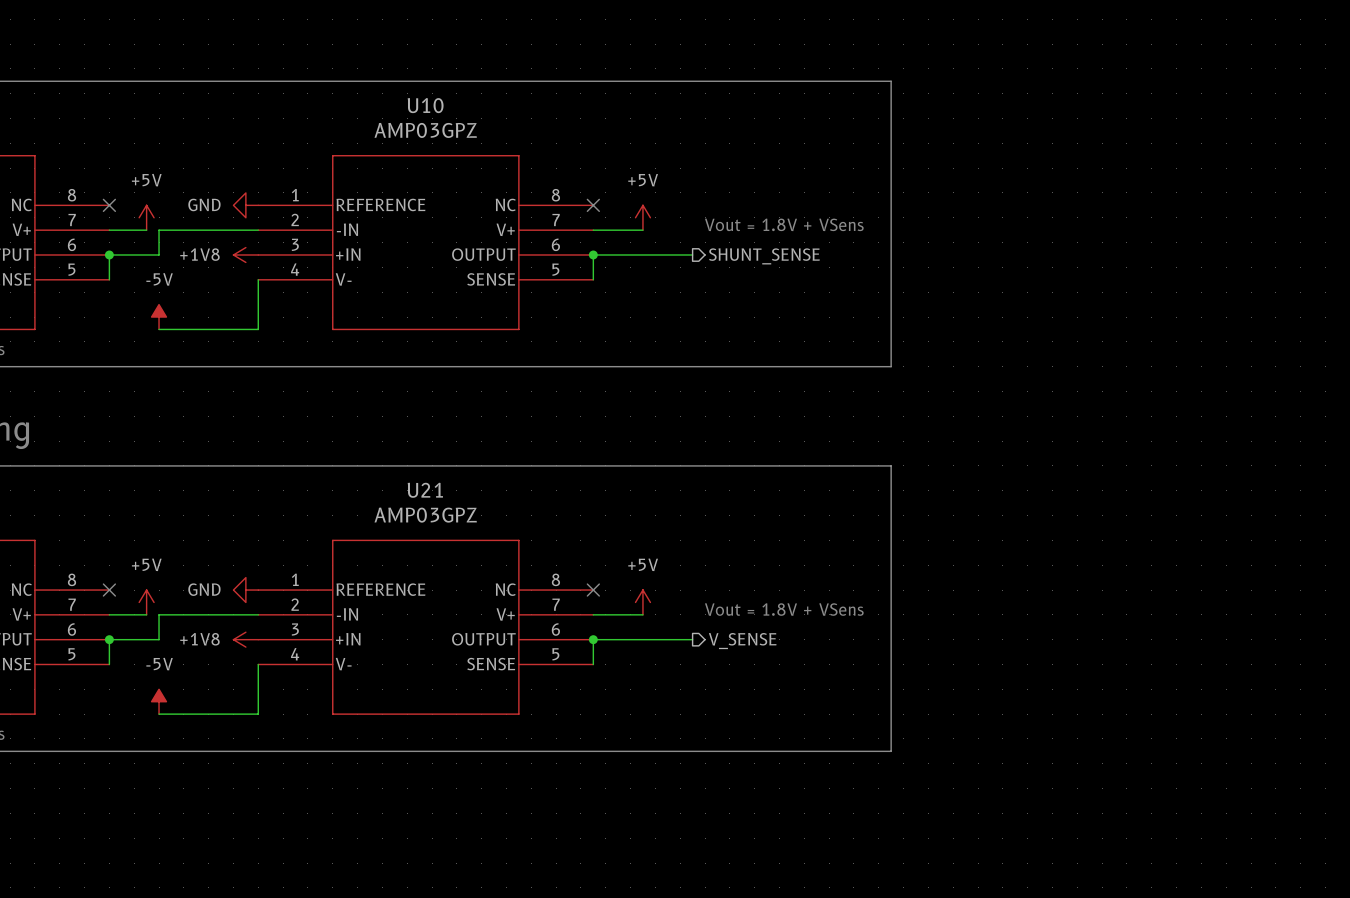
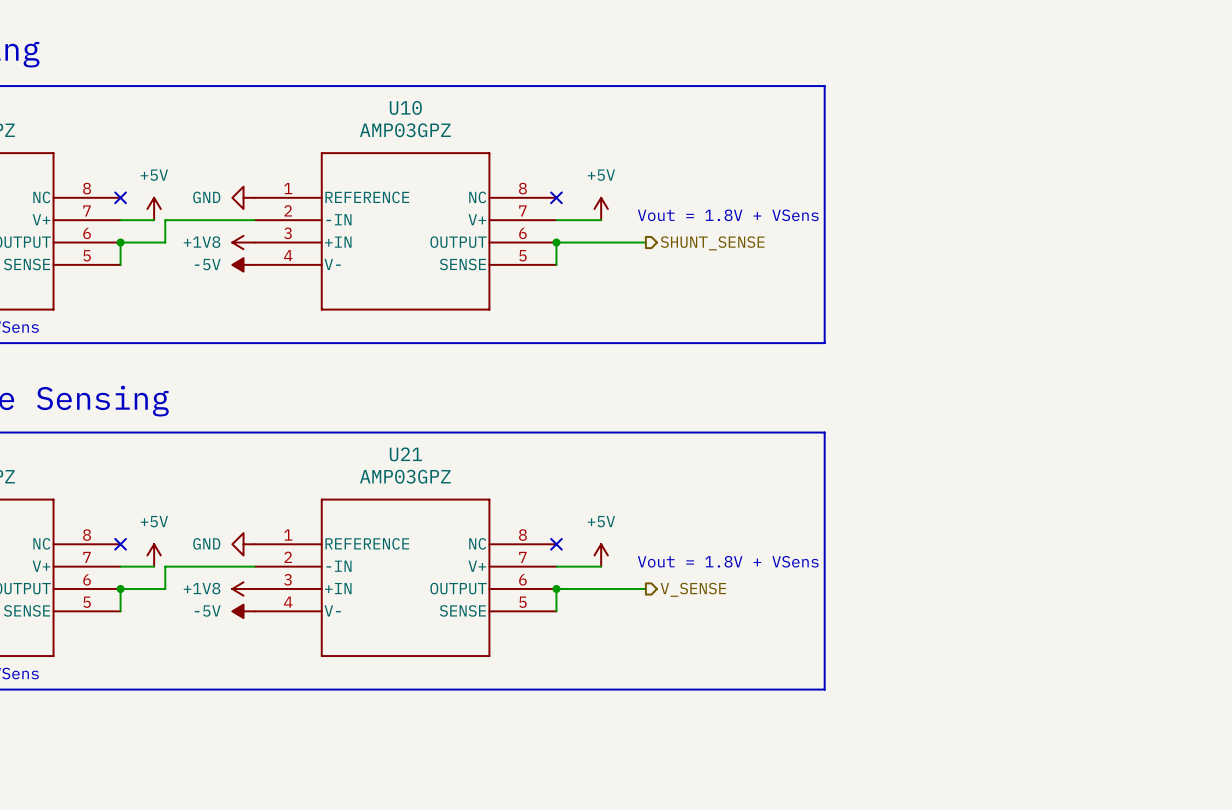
wire: (258, 279) (258, 329) (159, 329) -> none
power symbol rotation: 0° (159, 317) -> 90° counterclockwise (243, 264)
power symbol position: -5V (159, 317) -> -5V (243, 264)
wire: (258, 664) (258, 714) (159, 714) -> none
power symbol rotation: 0° (159, 701) -> 90° counterclockwise (243, 611)
power symbol position: -5V (159, 701) -> -5V (243, 611)

